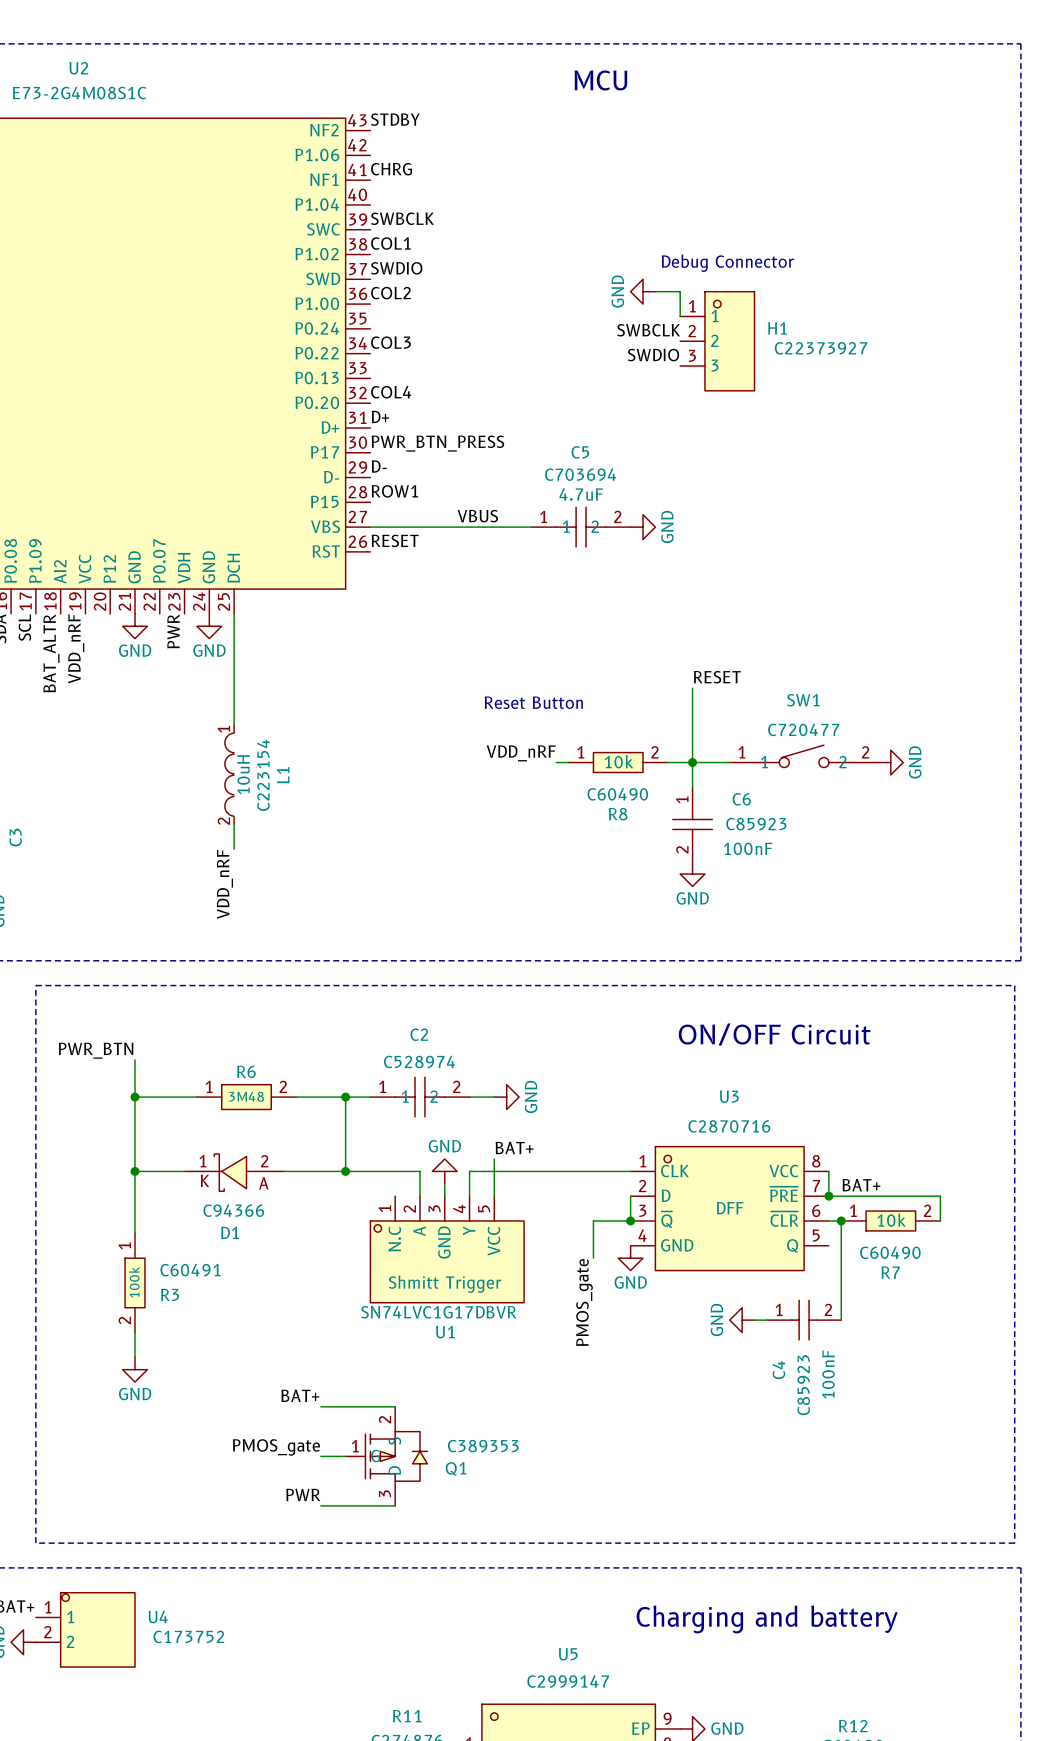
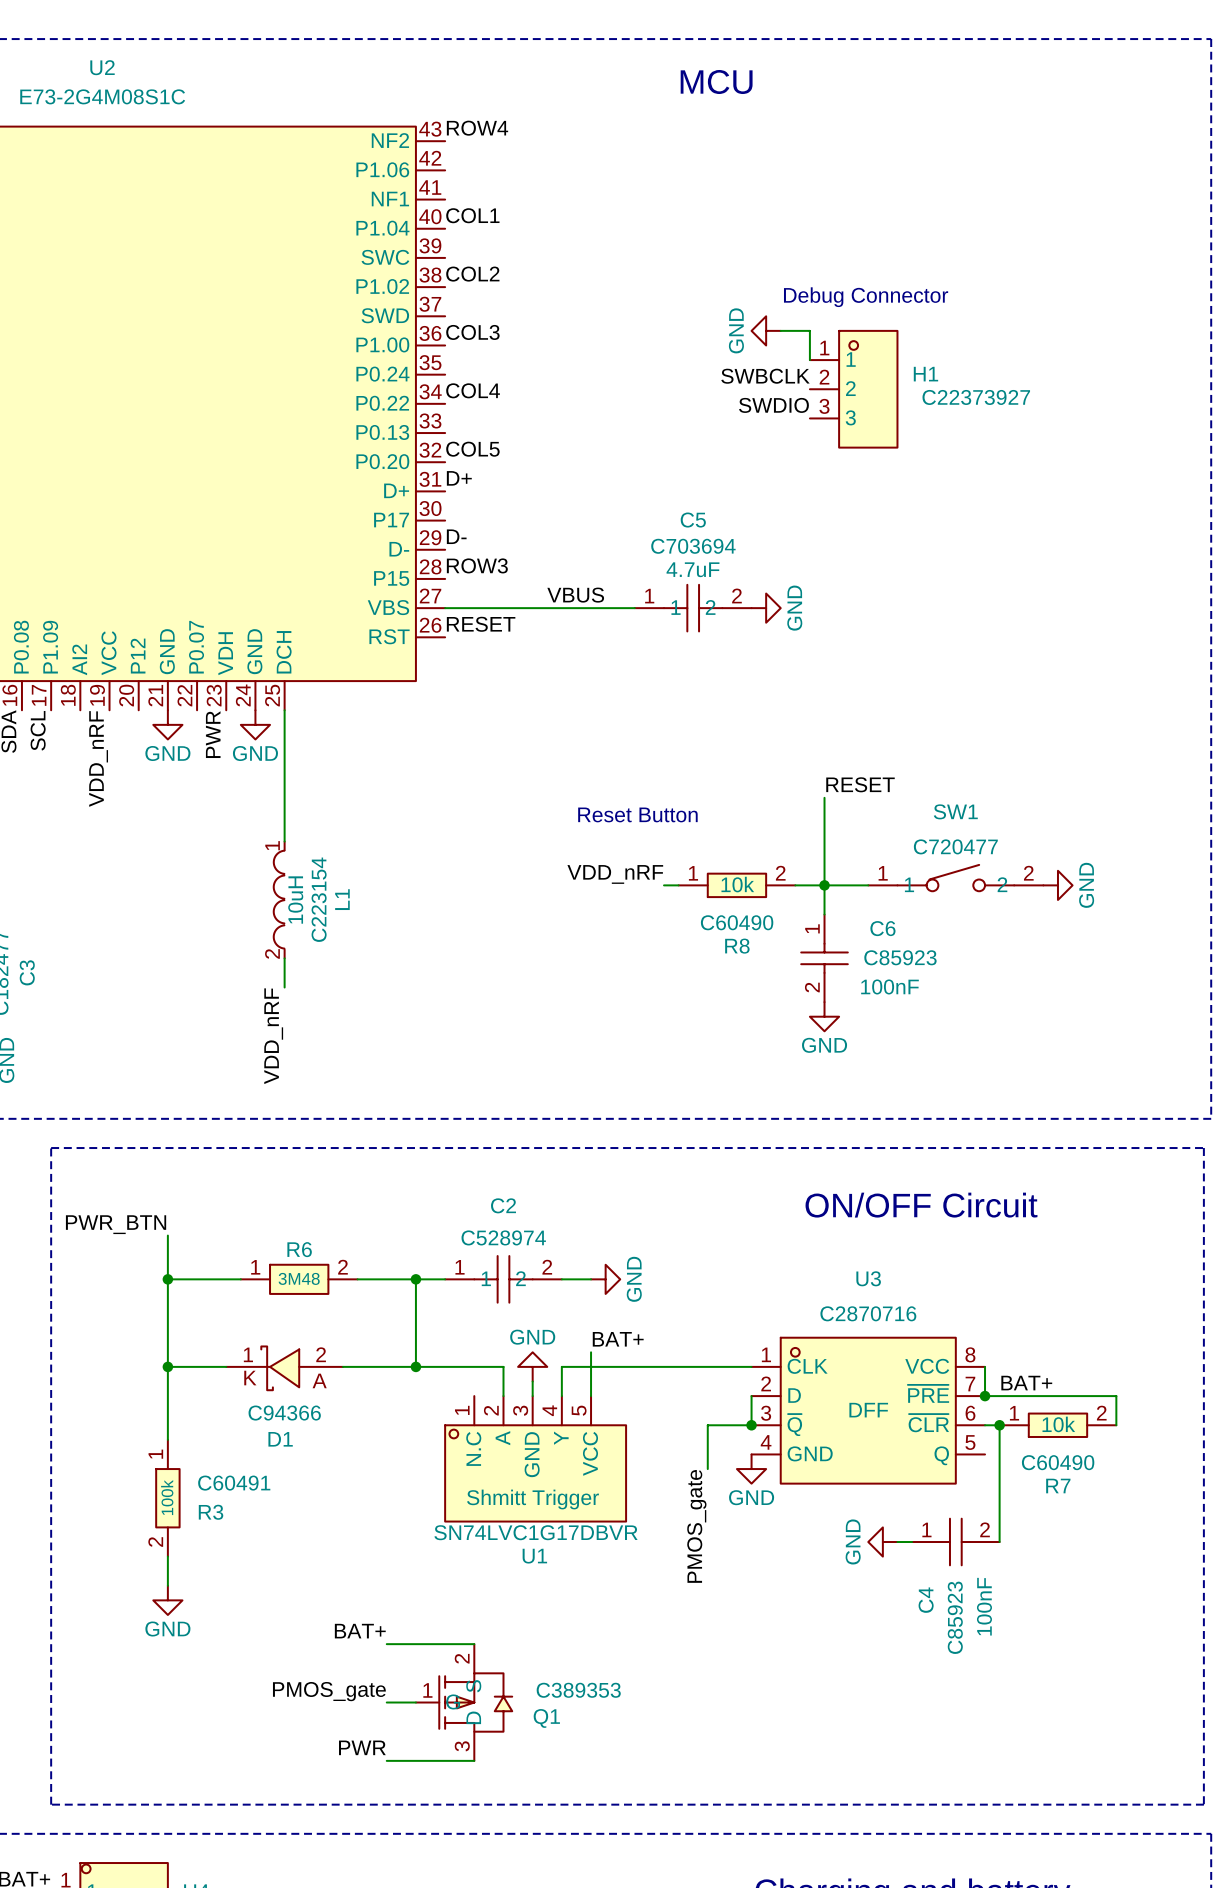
label: STDBY (395, 119) -> ROW4 (477, 128)
label: CHRG (391, 169) -> none
label: none -> COL1 (472, 215)
label: SWBCLK (402, 218) -> none
label: COL1 (390, 243) -> COL2 (472, 274)
label: SWDIO (396, 268) -> none
label: COL2 (390, 293) -> COL3 (472, 332)
label: COL3 (390, 342) -> COL4 (473, 390)
label: COL4 (391, 392) -> COL5 (472, 449)
label: PWR_BTN_PRESS (437, 443) -> none
label: ROW1 (394, 491) -> ROW3 (477, 565)
label: BAT_ALTR (51, 653) -> none

